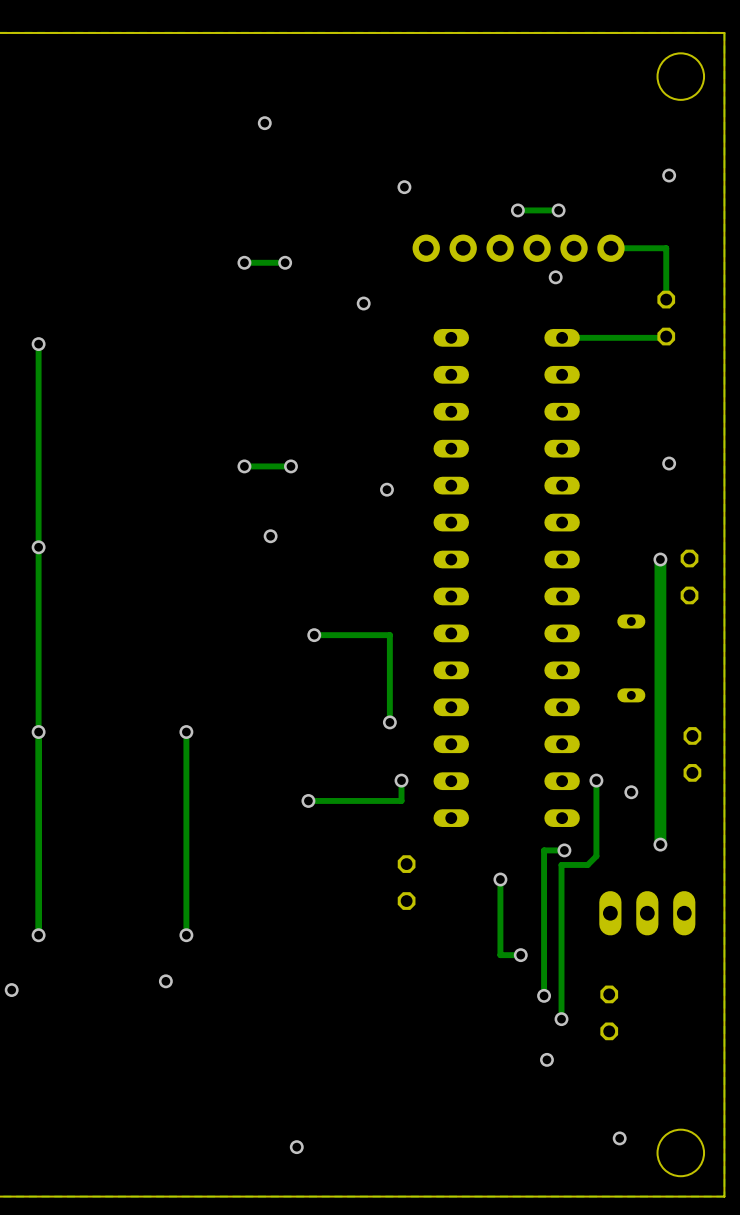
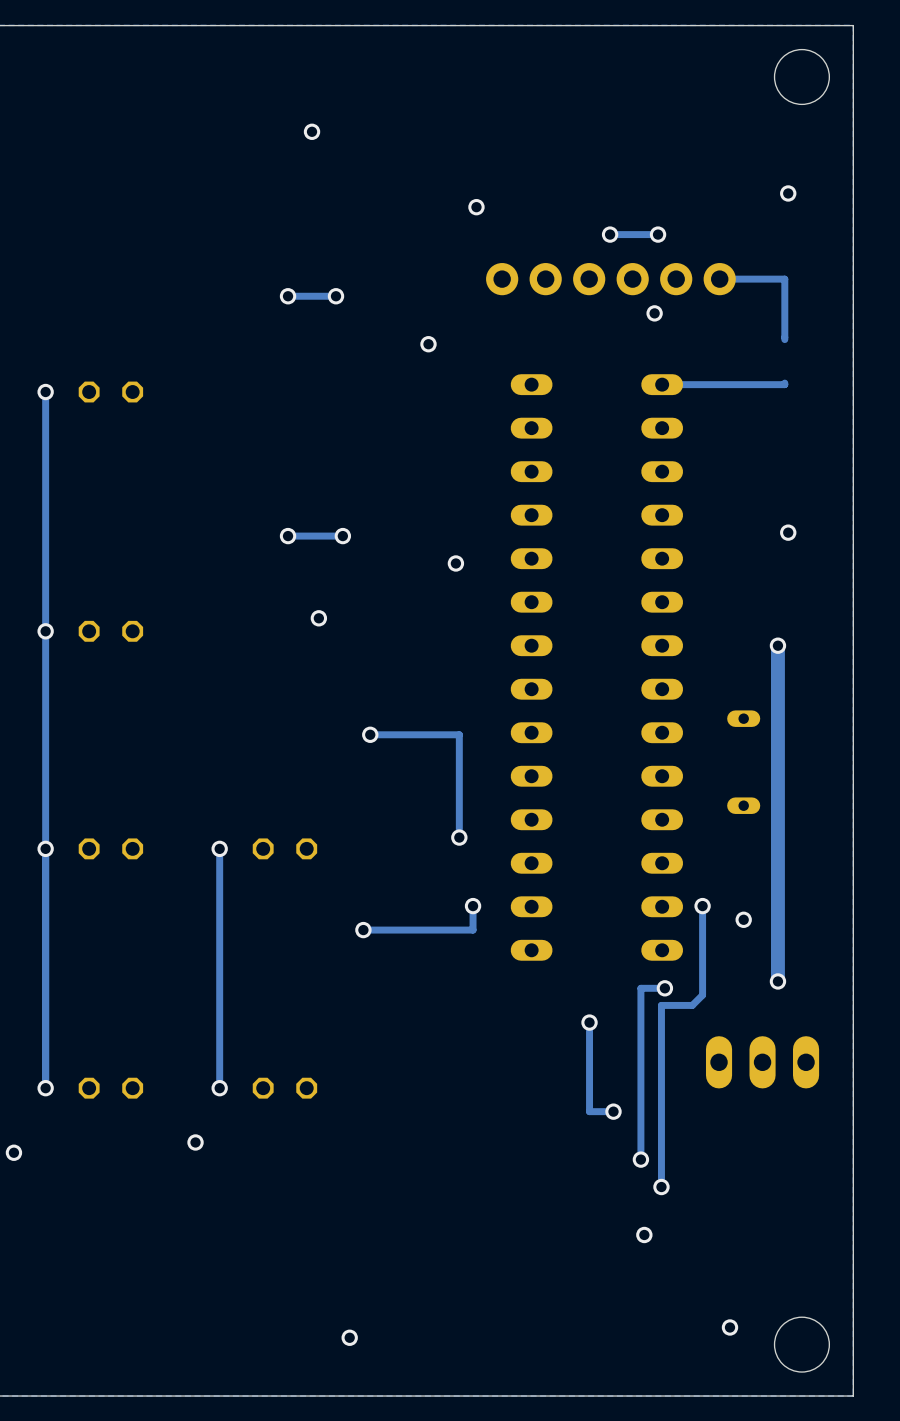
part: (666, 318) -> none
part: none -> (110, 392)
part: none -> (110, 631)
part: (689, 576) -> none
part: none -> (110, 848)
part: none -> (284, 848)
part: (692, 754) -> none
part: (406, 882) -> none
part: none -> (110, 1088)
part: none -> (284, 1088)
part: (609, 1012) -> none

